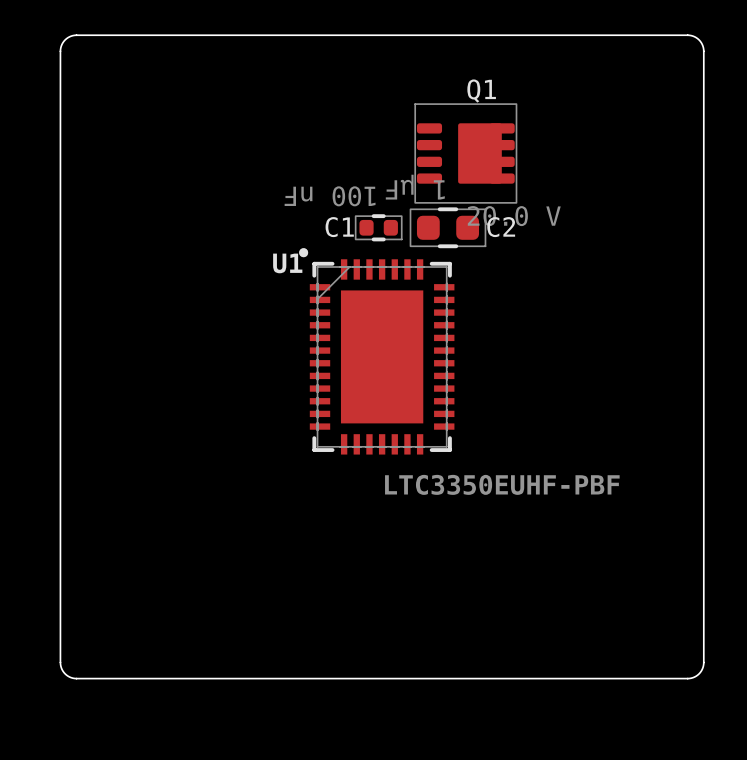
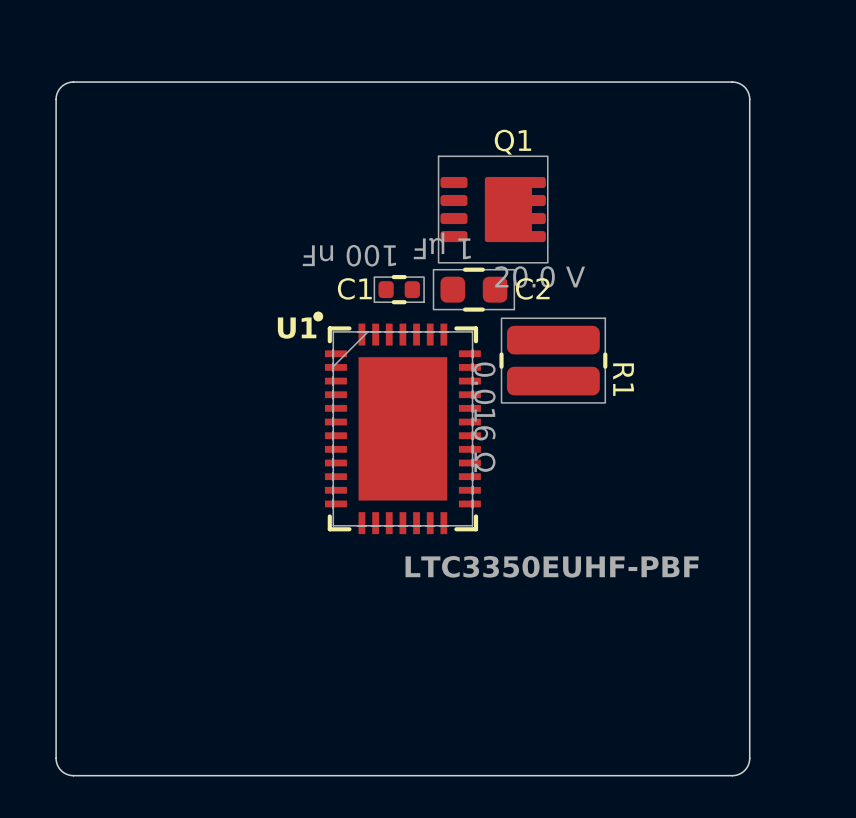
R1: none -> 0.016 Ω (553, 360)

